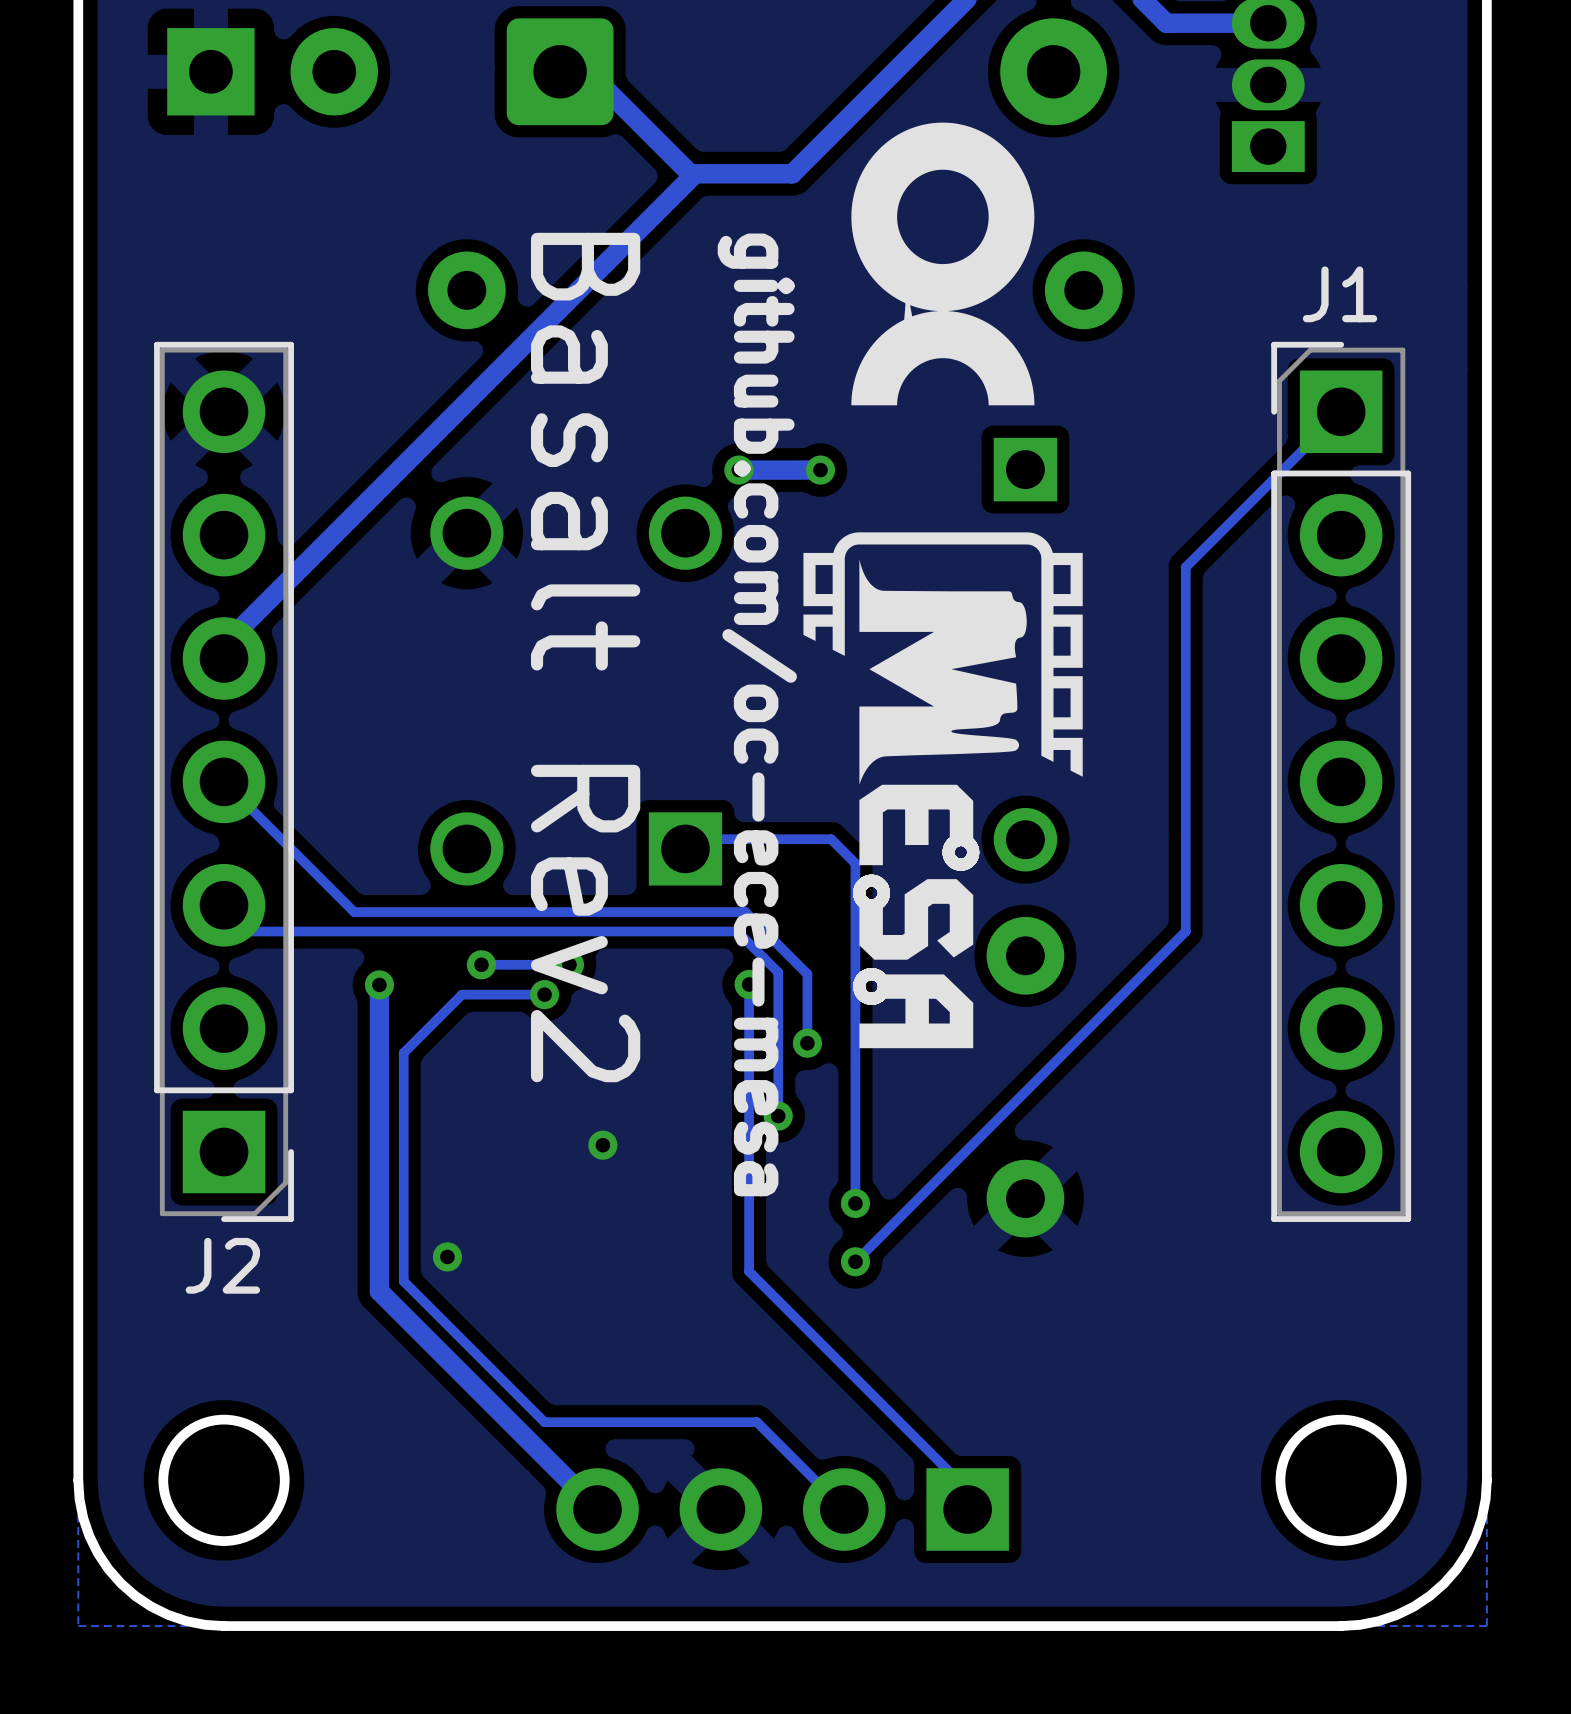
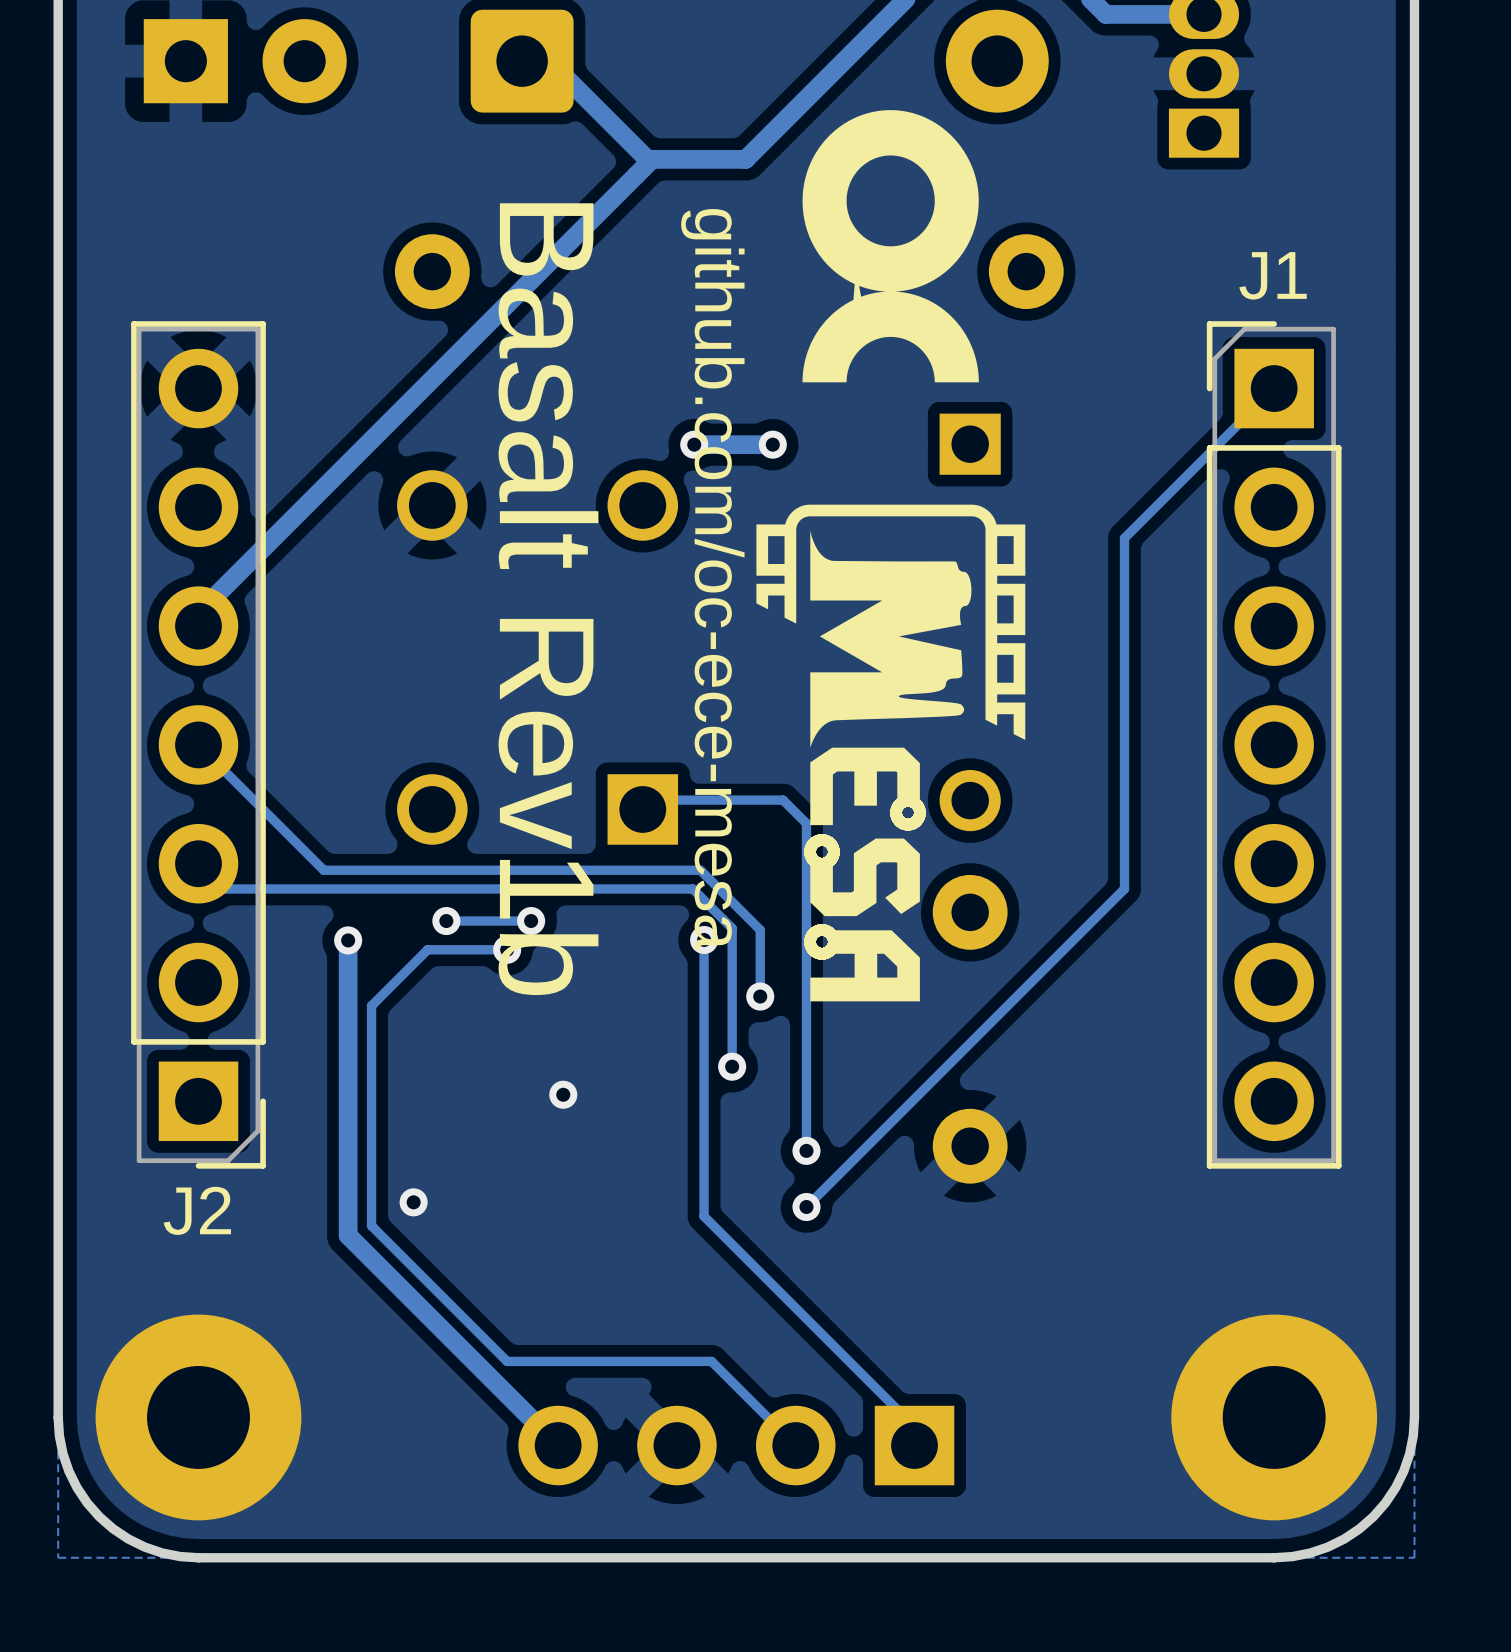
text: Basalt Rev2 (585, 657) -> Basalt Rev1b (548, 599)
round board edge: [158, 1414, 290, 1546] -> none
round board edge: [1275, 1414, 1407, 1546] -> none
part: none -> (198, 1417)
part: none -> (1274, 1417)

